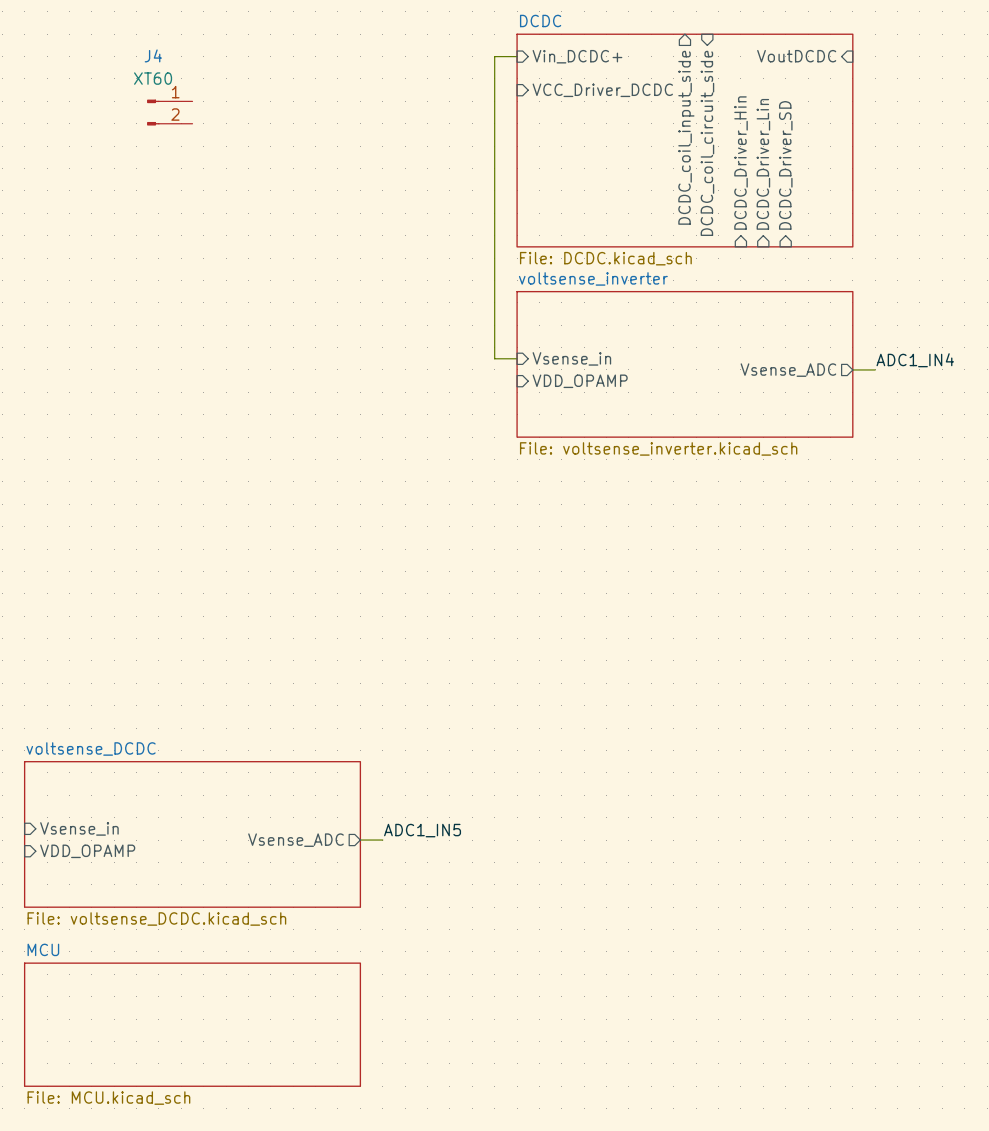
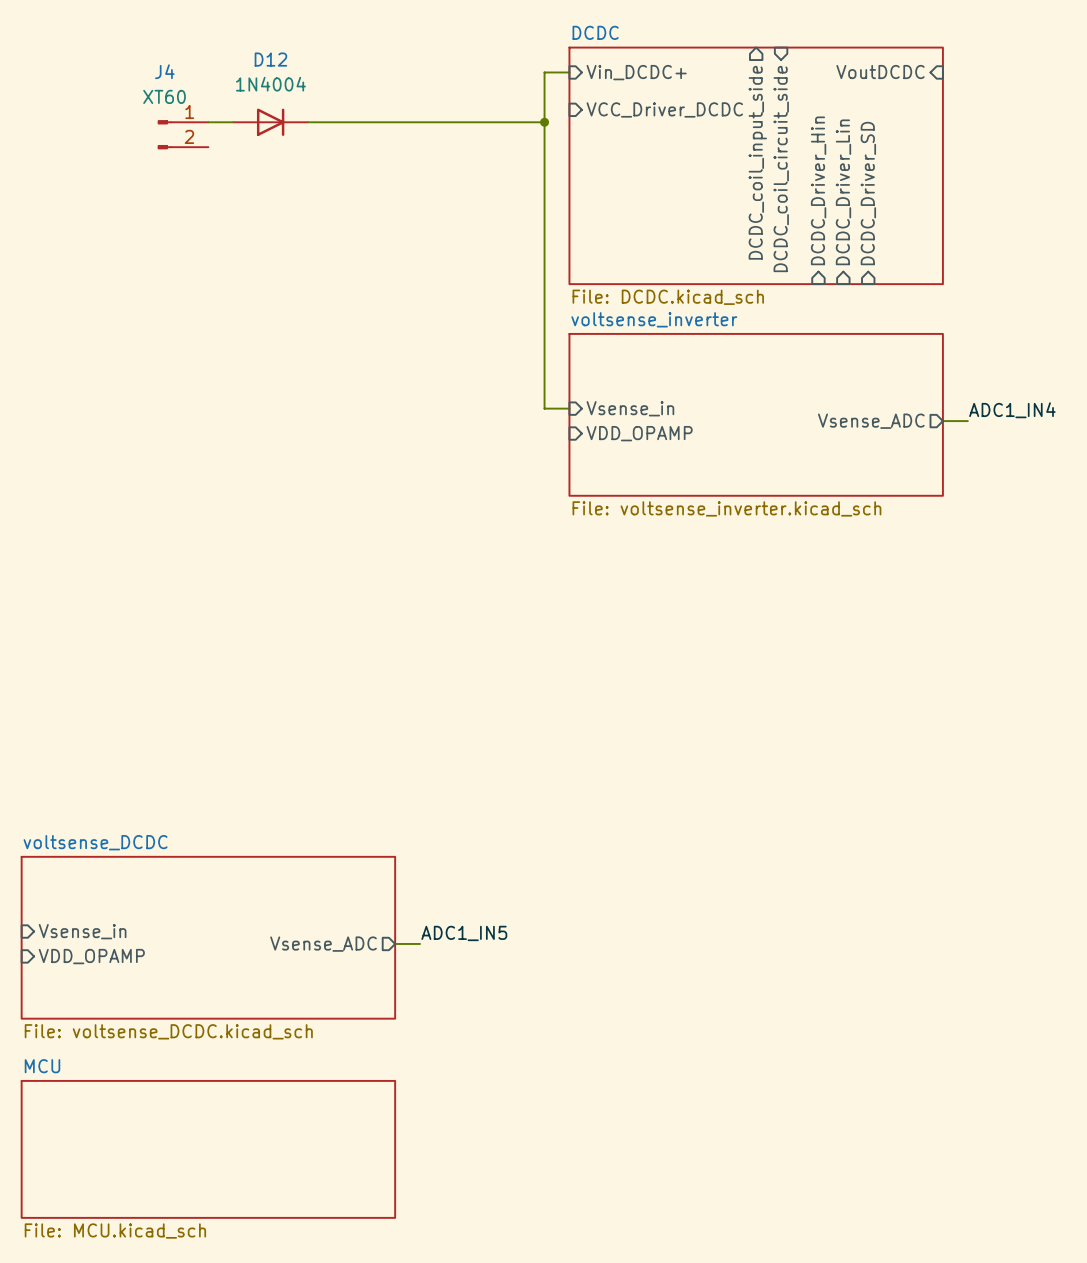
wire: none -> (208, 122) (233, 122)
D12: none -> 1N4004 (270, 122)
wire: none -> (307, 122) (544, 122)
junction: none -> (544, 122)

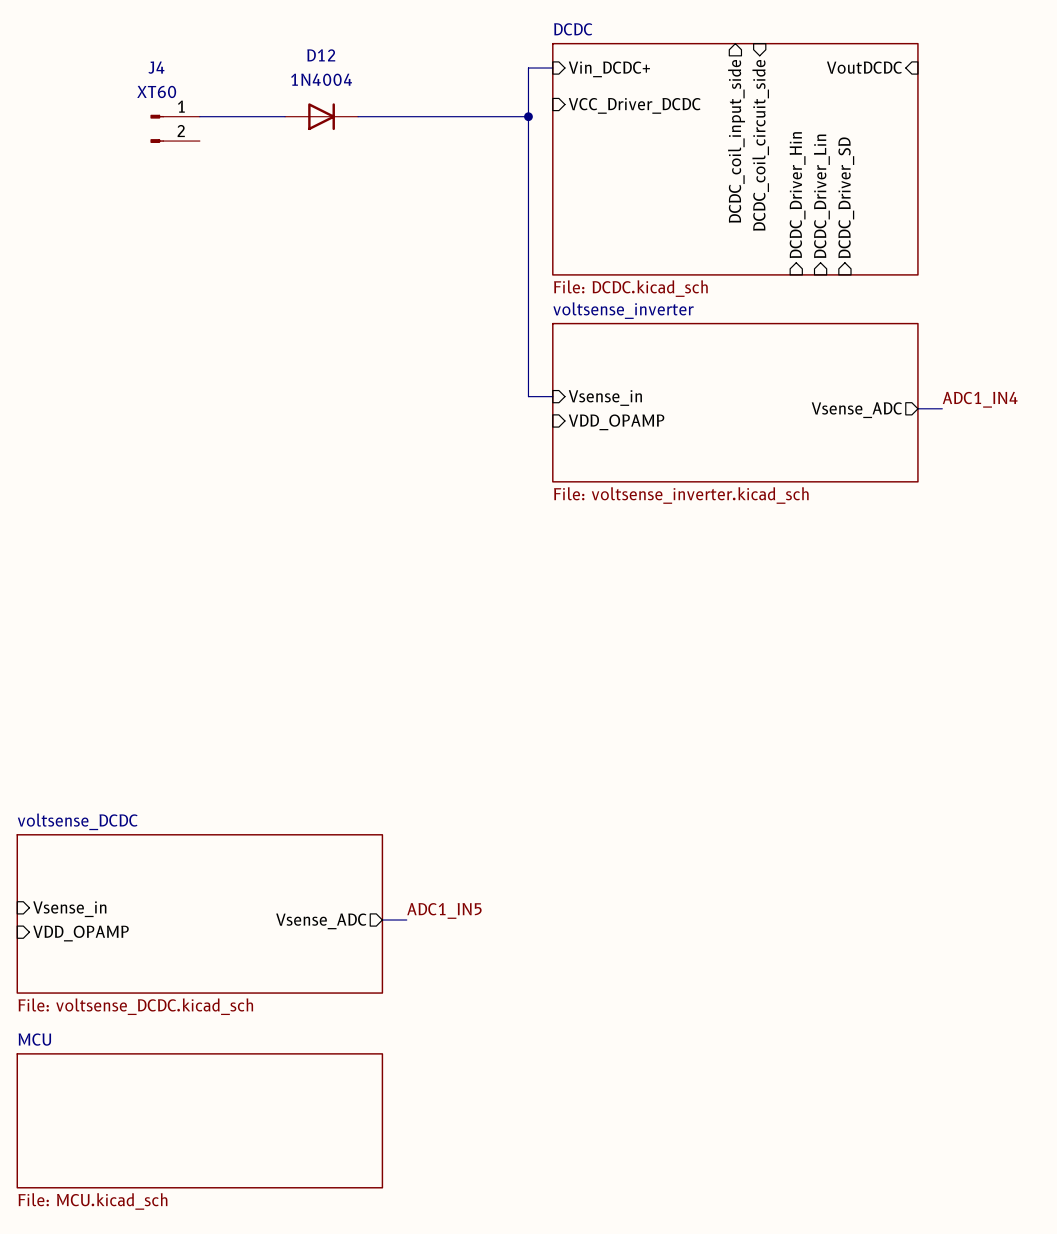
D12 position: (270, 122) -> (321, 116)

